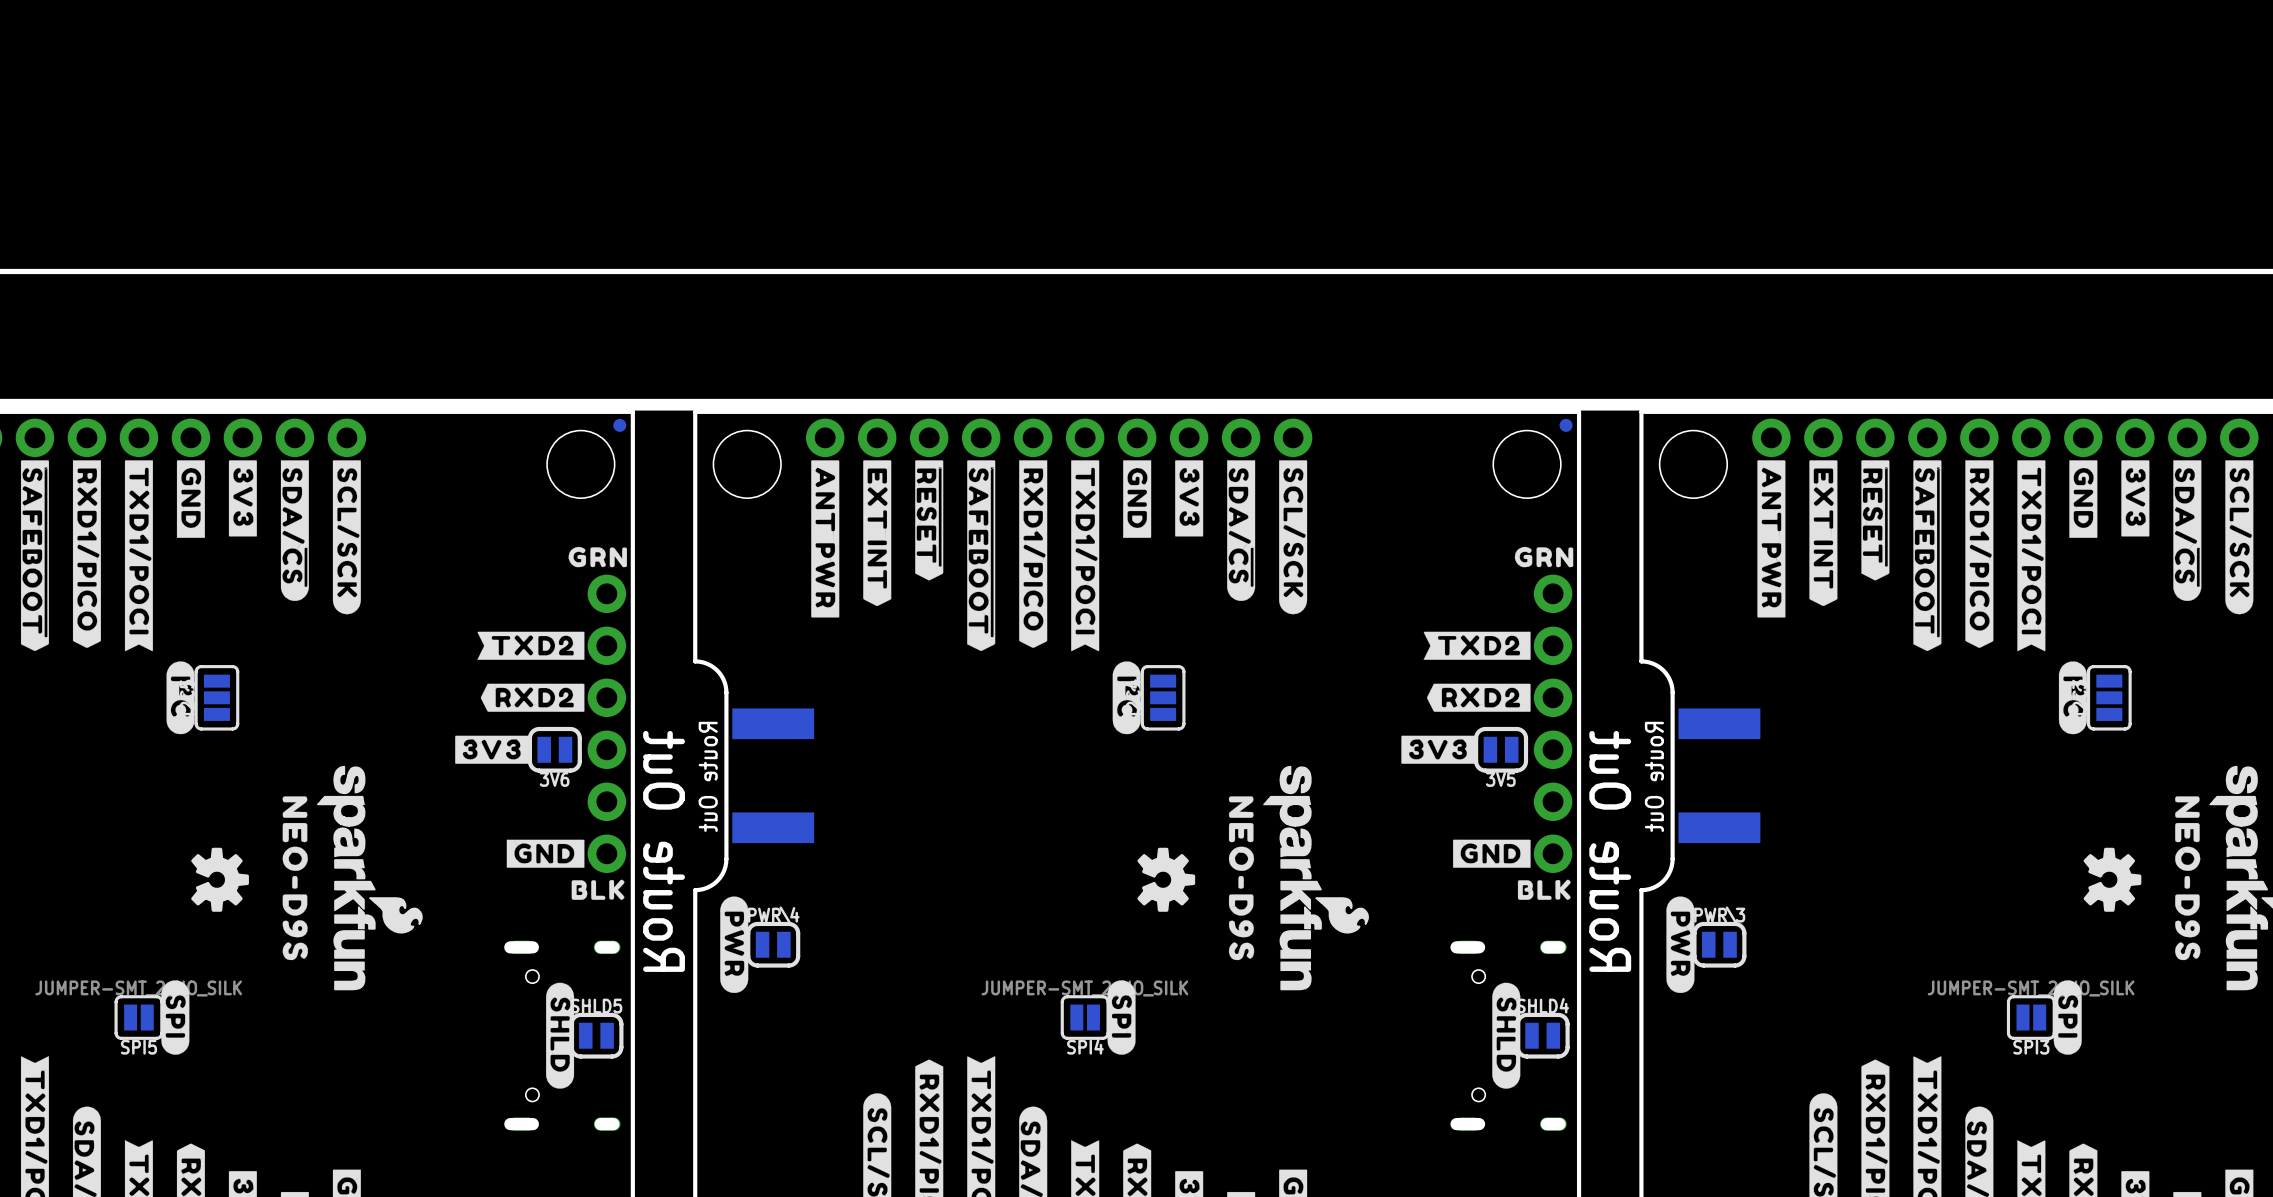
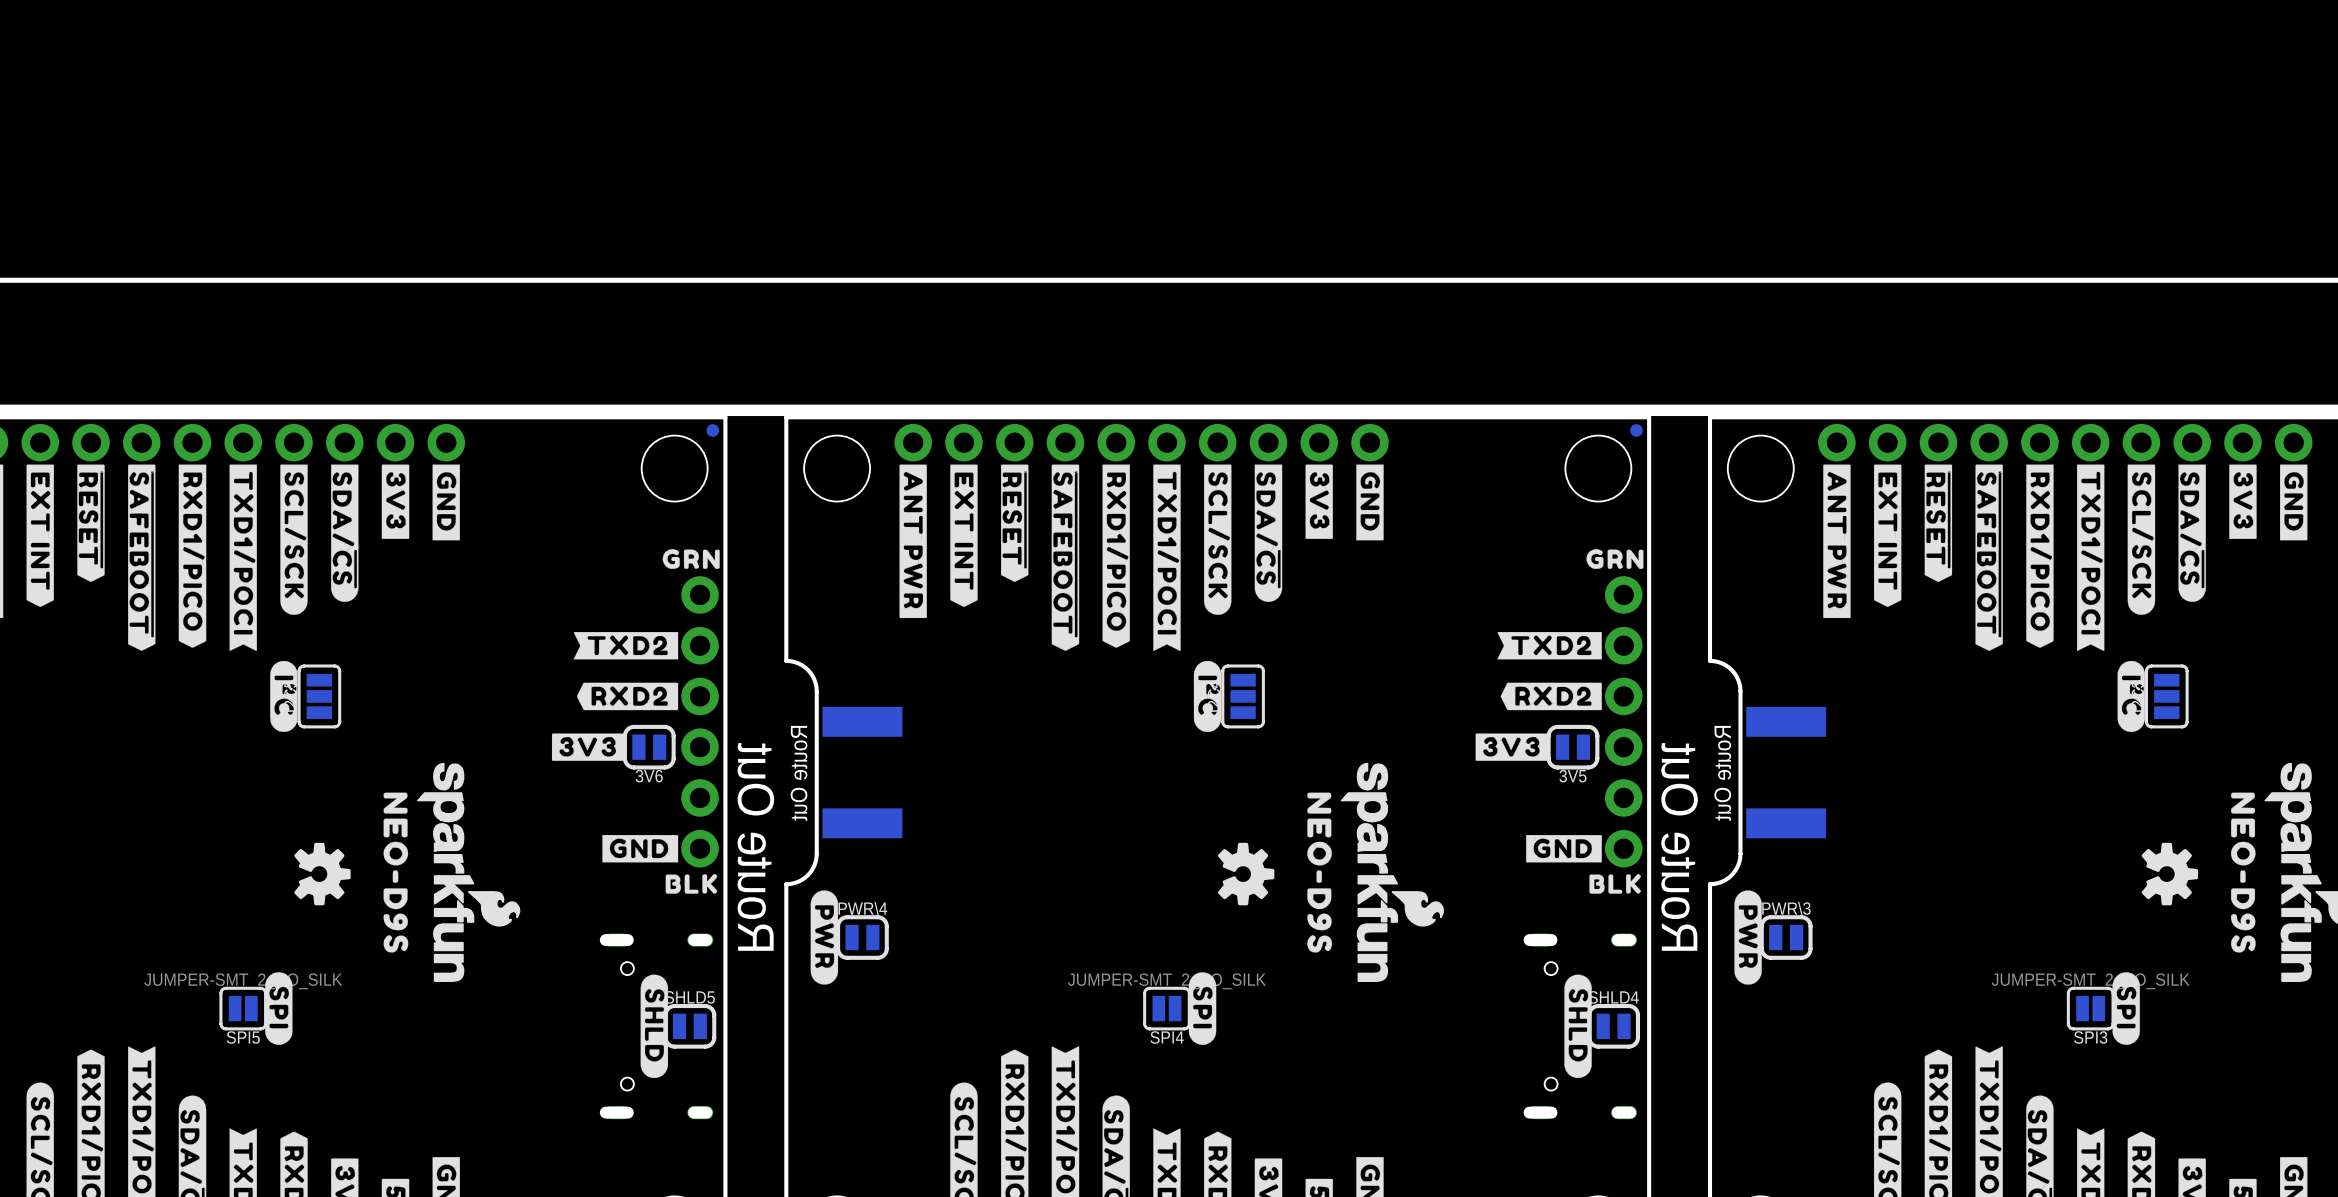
drawing position: (242, 498) -> (395, 501)
drawing position: (1189, 498) -> (1319, 501)
drawing position: (2135, 498) -> (2242, 501)
drawing position: (190, 499) -> (446, 502)
drawing position: (1137, 499) -> (1369, 502)
drawing position: (2083, 499) -> (2293, 502)
drawing position: (294, 530) -> (344, 533)
drawing position: (1241, 530) -> (1268, 533)
drawing position: (2187, 530) -> (2192, 533)
drawing position: (346, 537) -> (294, 539)
drawing position: (1293, 537) -> (1217, 539)
drawing position: (2239, 537) -> (2141, 539)

